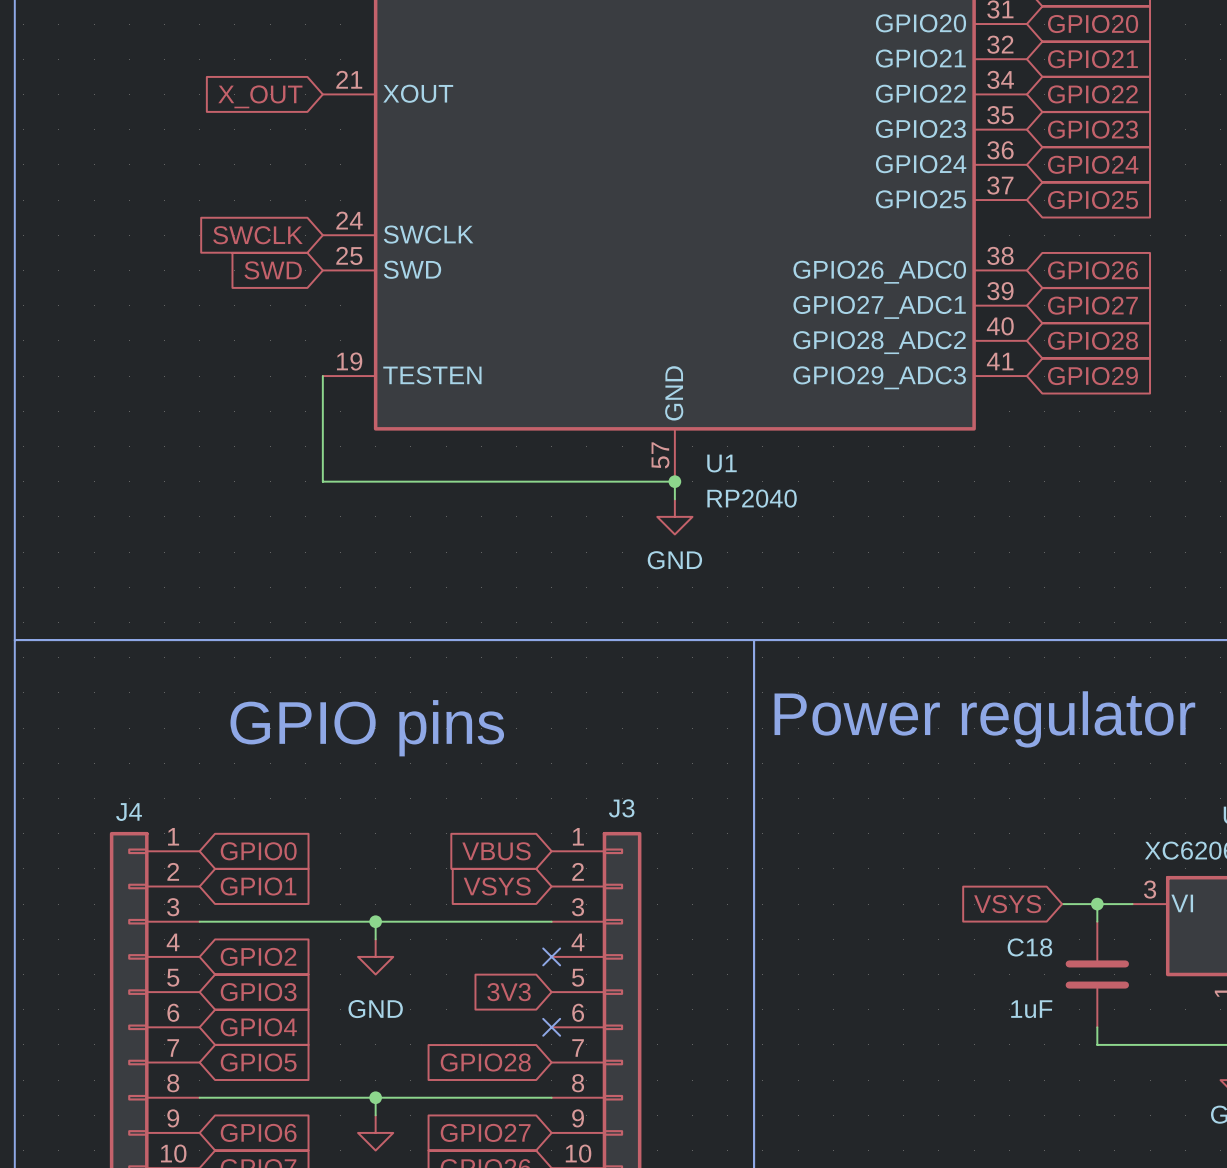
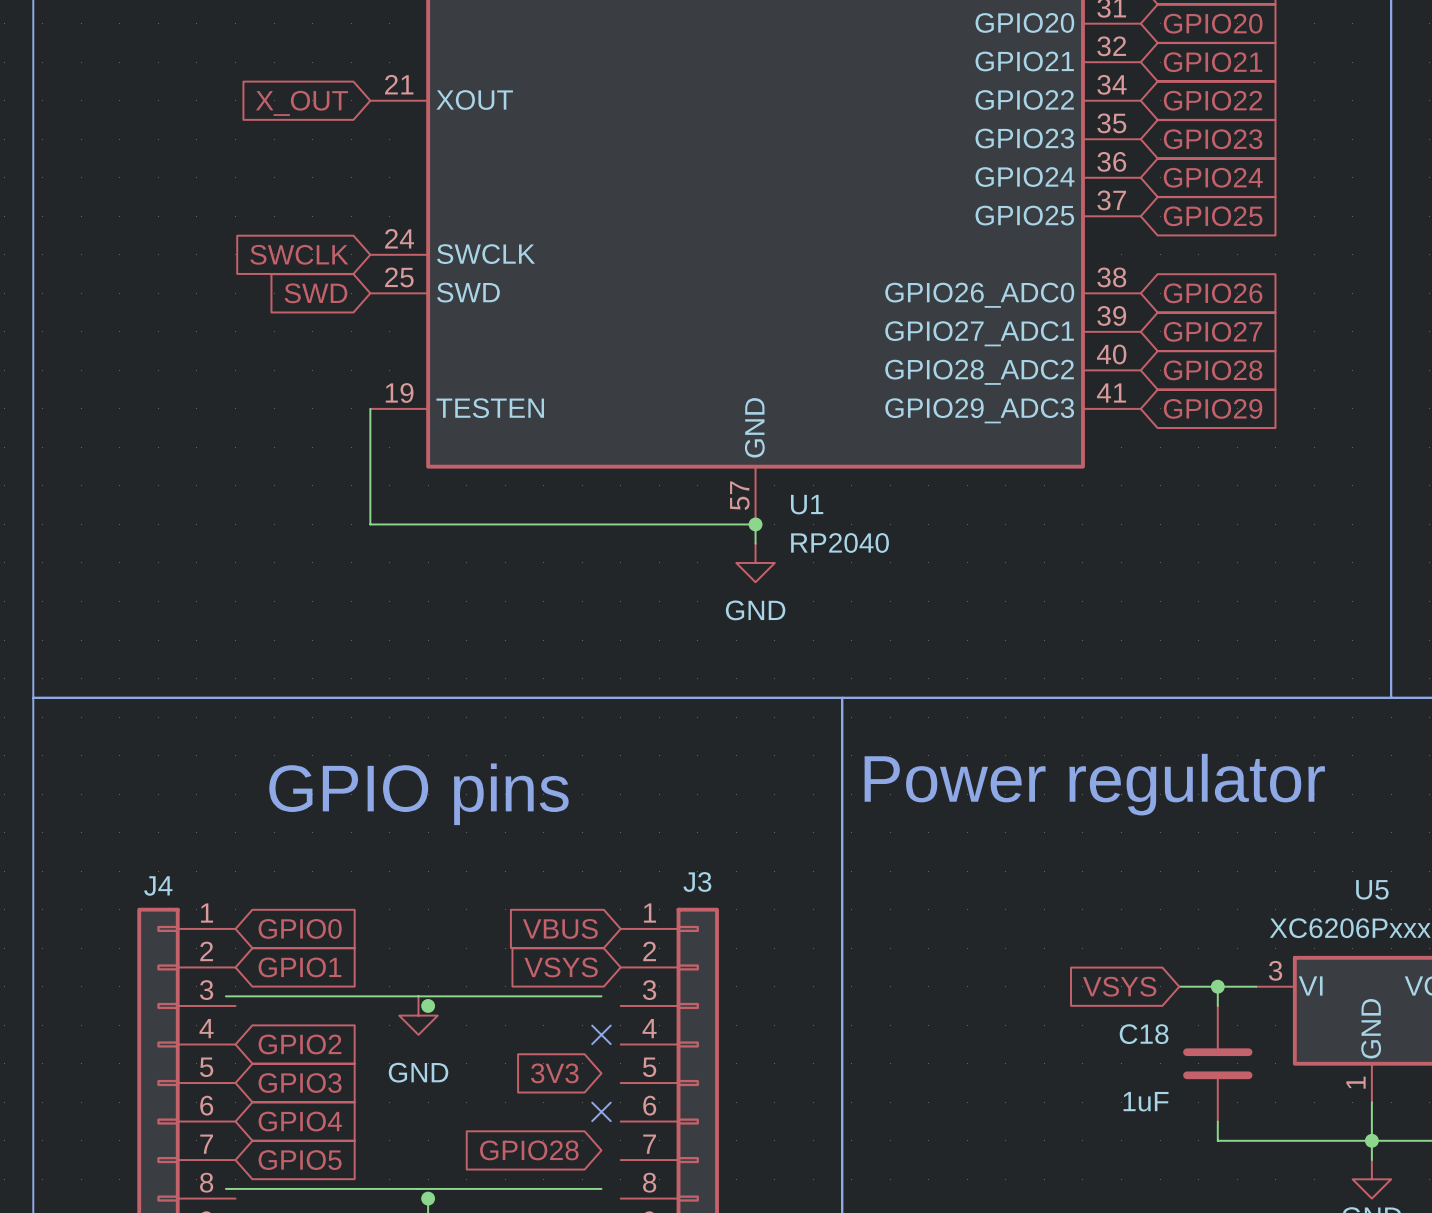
wire: none -> (225, 996) (601, 996)
wire: (199, 921) (551, 921) -> none
power symbol position: GND (375, 956) -> GND (418, 1015)
no-connect mark position: (551, 956) -> (601, 1034)
global label position: 3V3 (509, 992) -> 3V3 (554, 1073)
no-connect mark position: (551, 1027) -> (601, 1111)
global label position: GPIO28 (485, 1062) -> GPIO28 (529, 1150)
wire: none -> (225, 1188) (601, 1188)
wire: (199, 1097) (551, 1097) -> none

